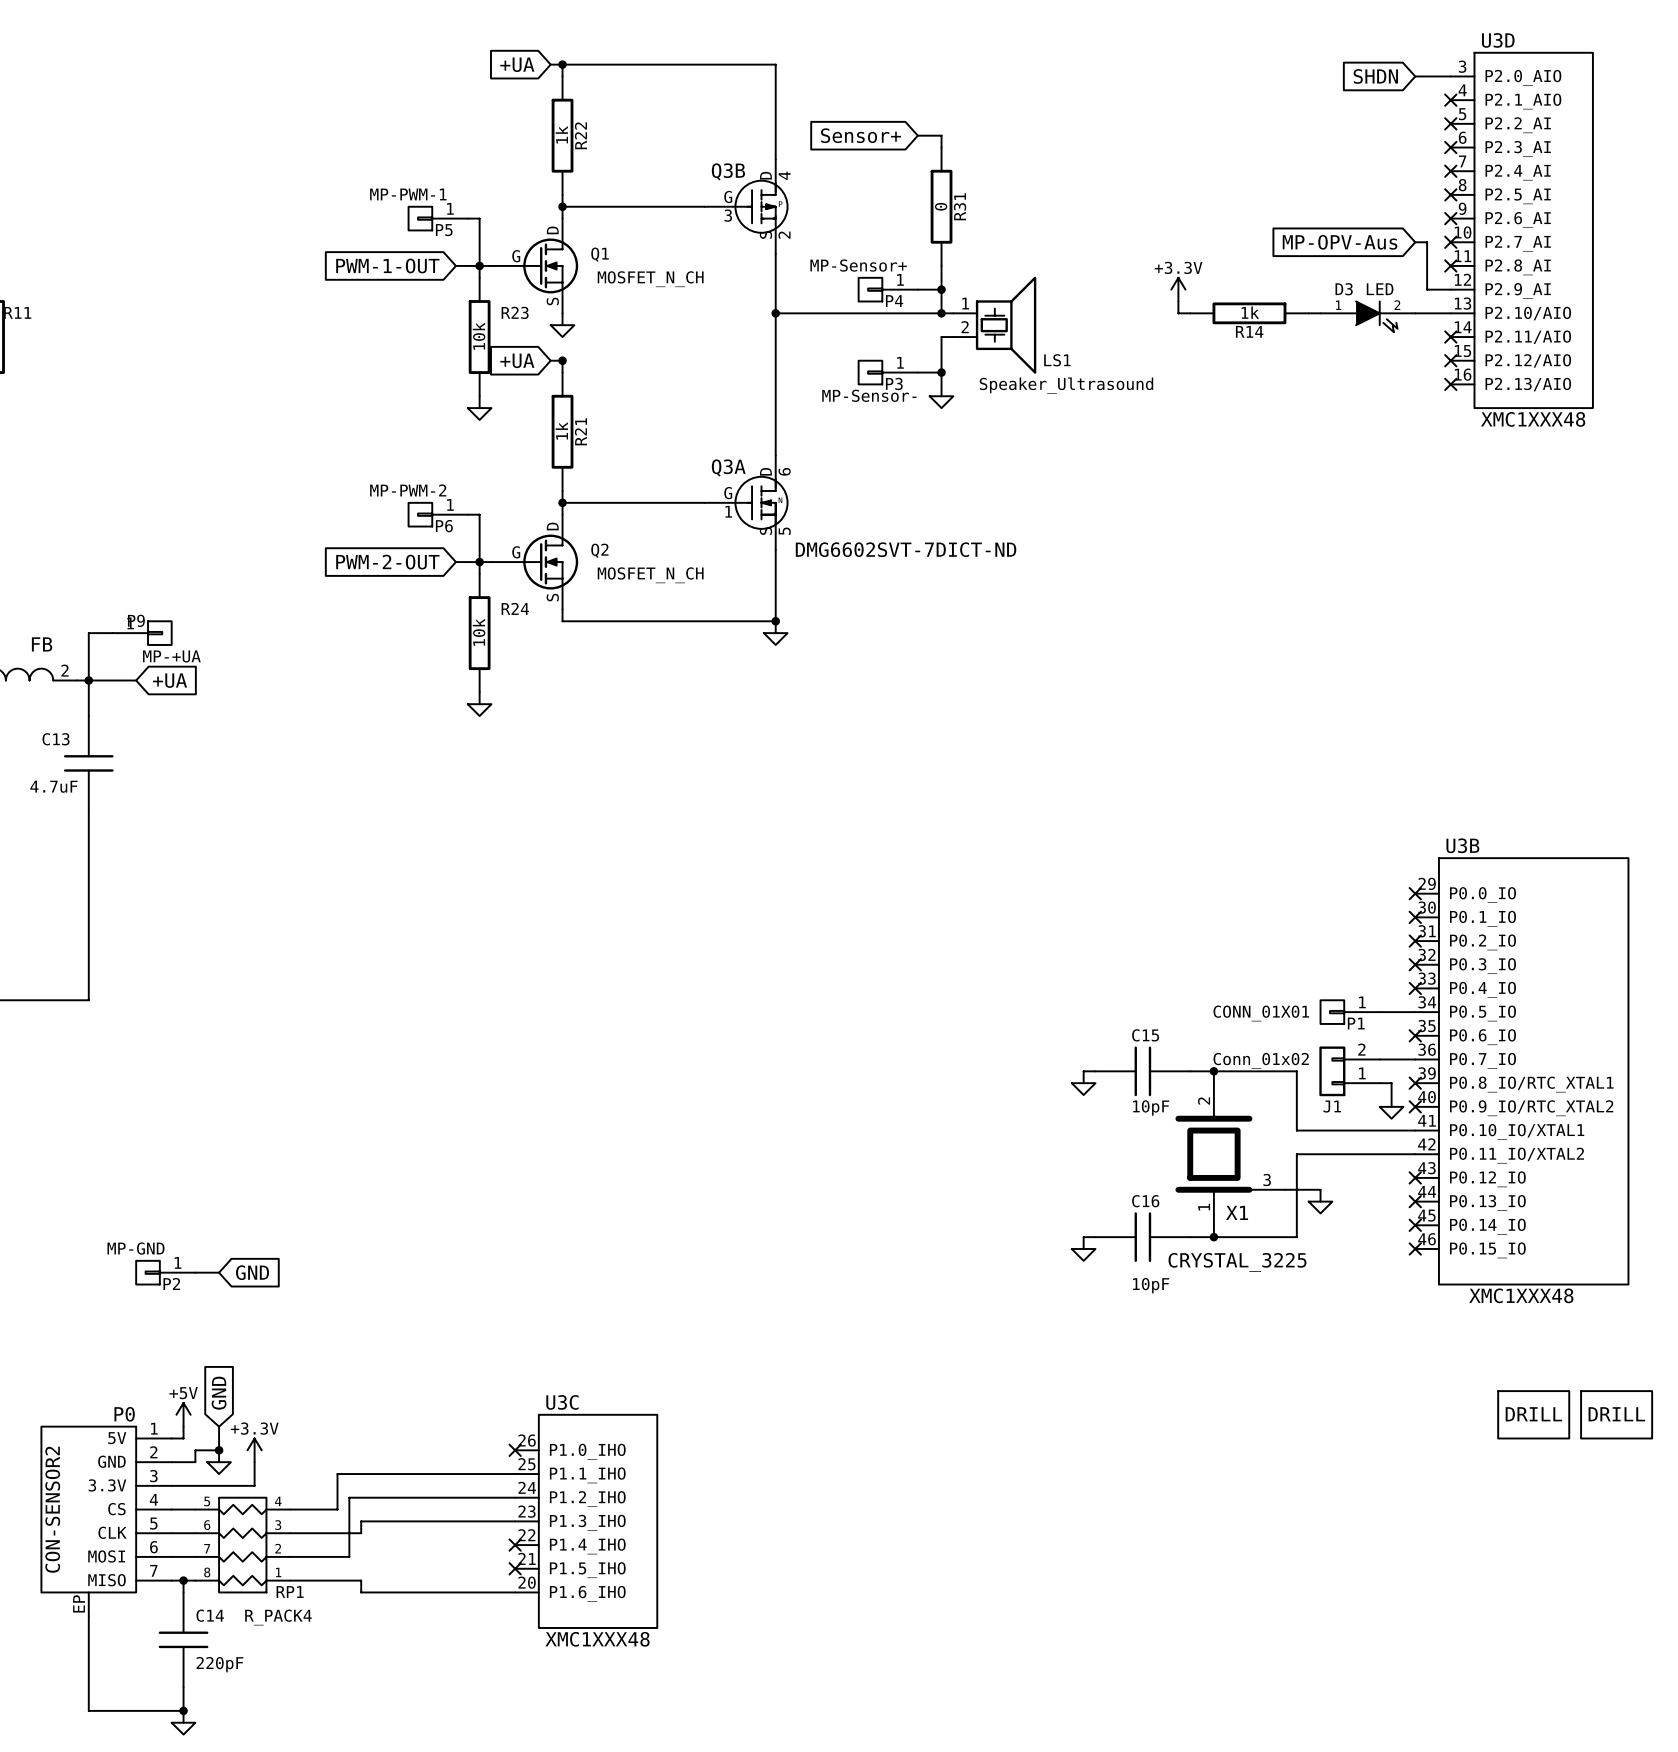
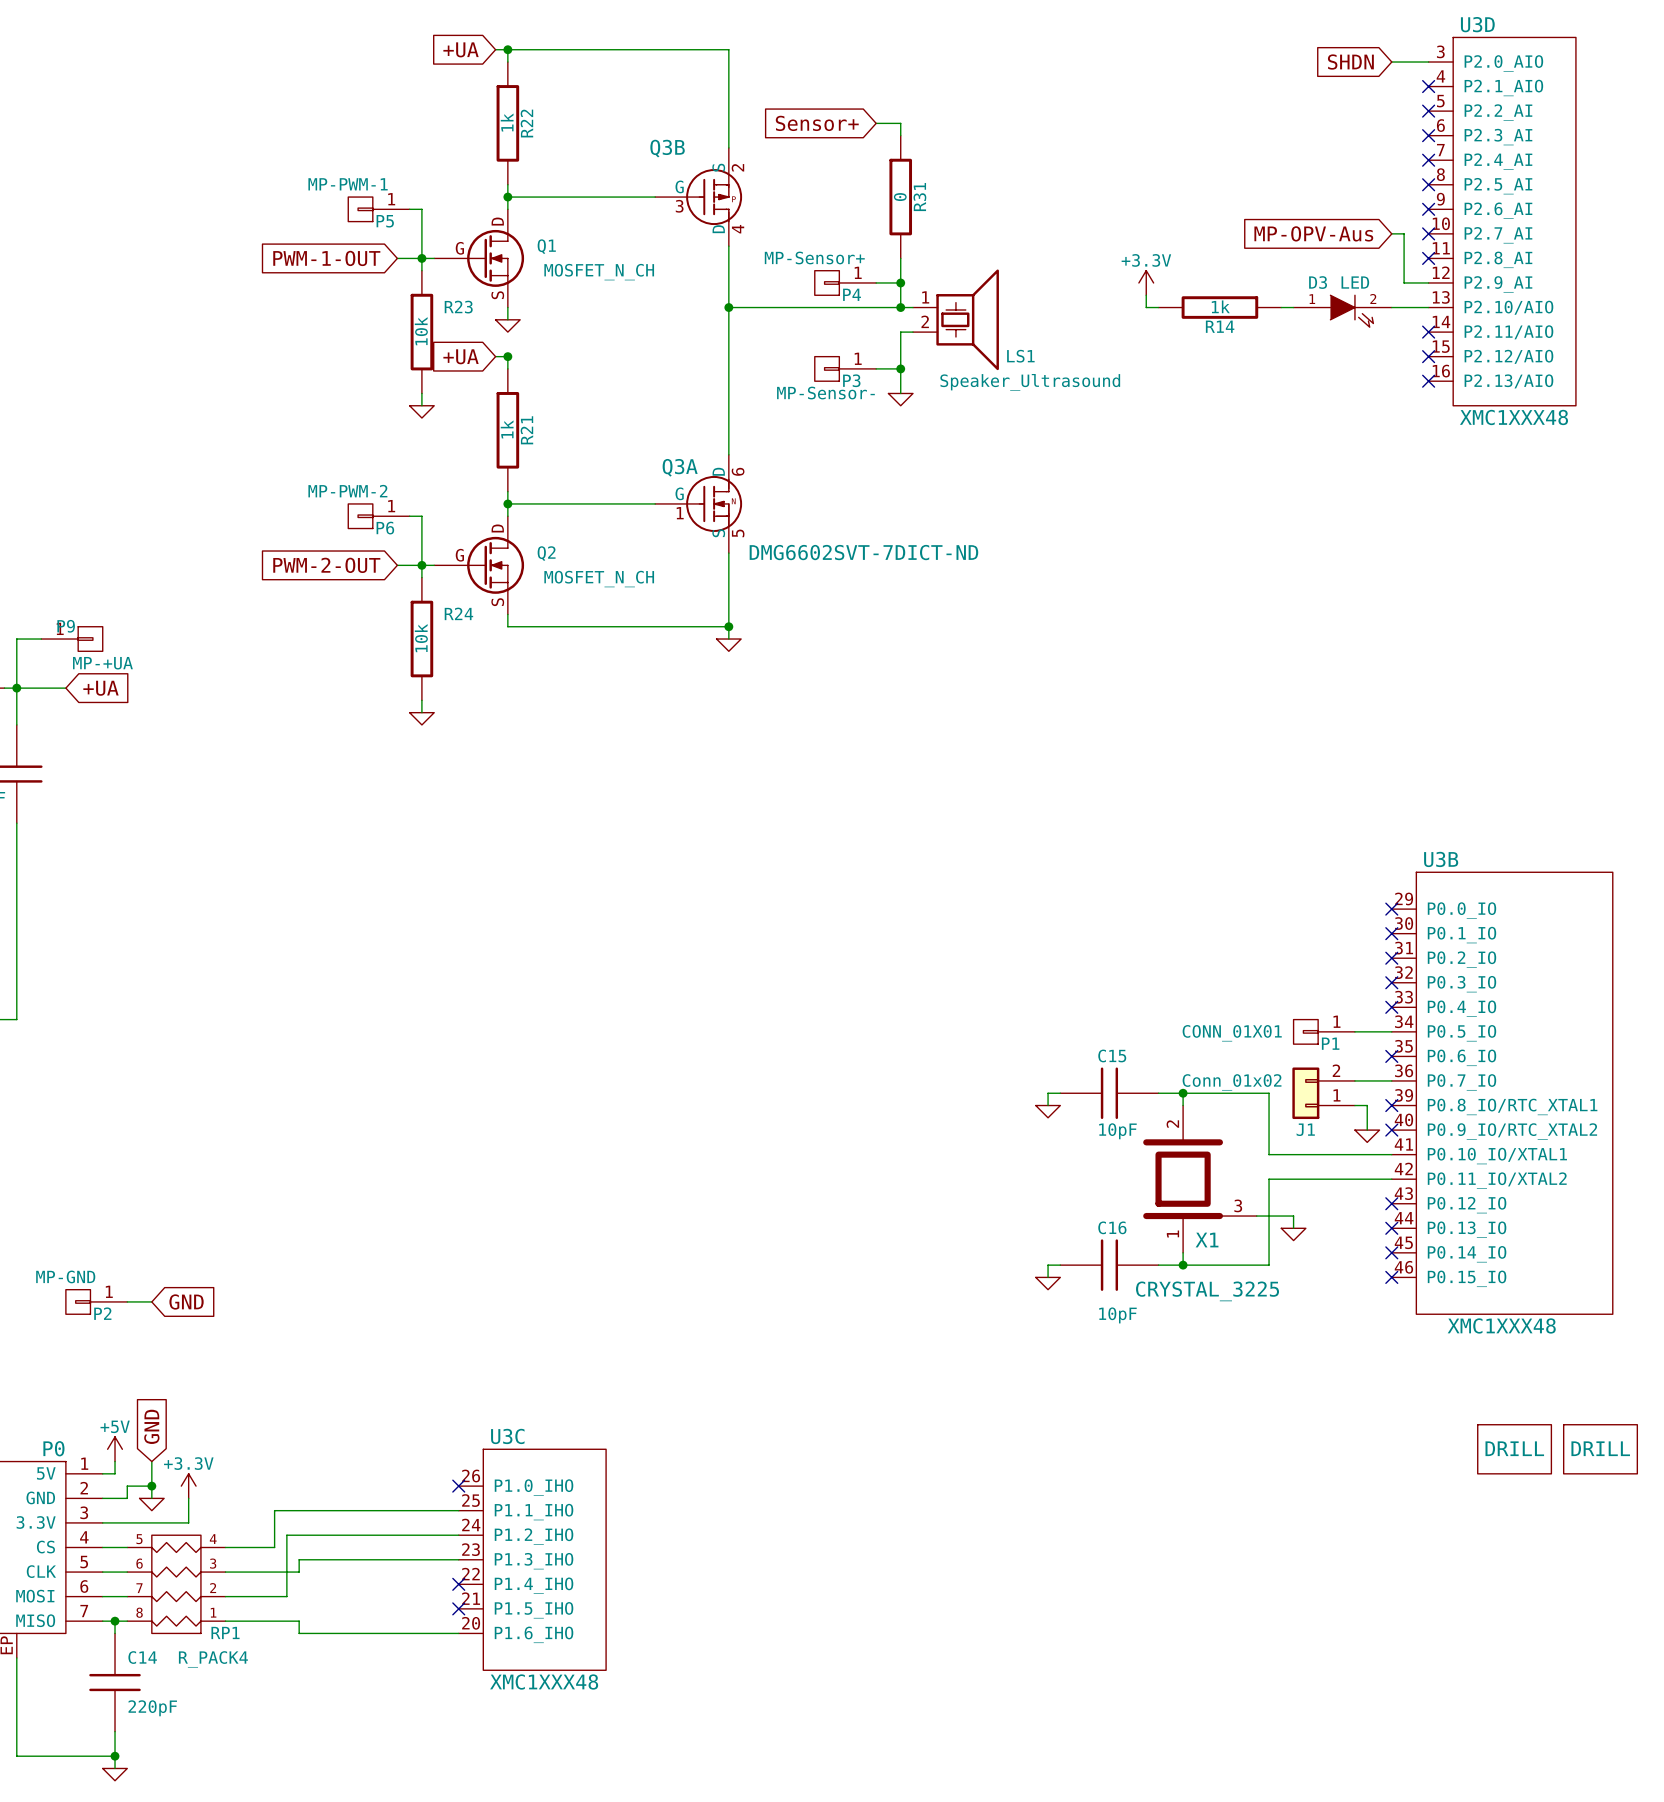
Q3B flip: as is (761, 206) -> up-down (714, 197)

